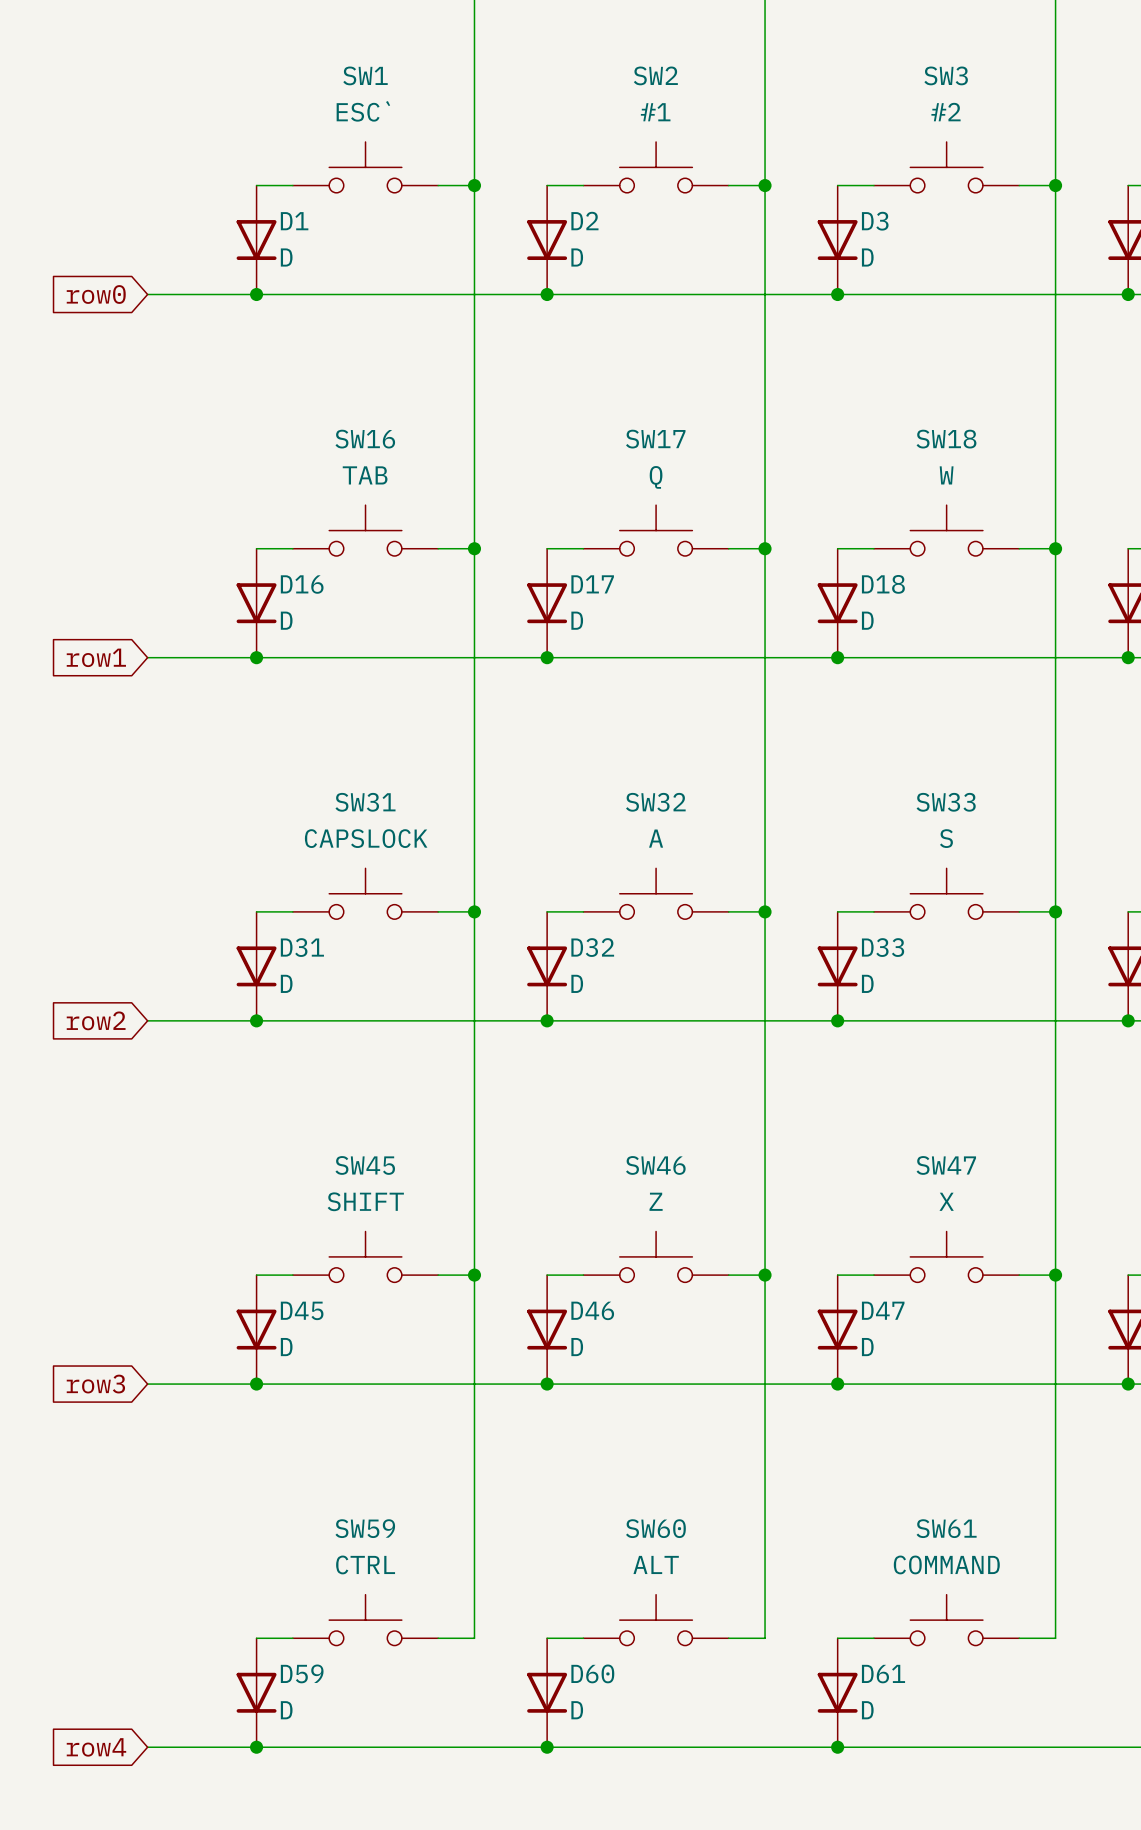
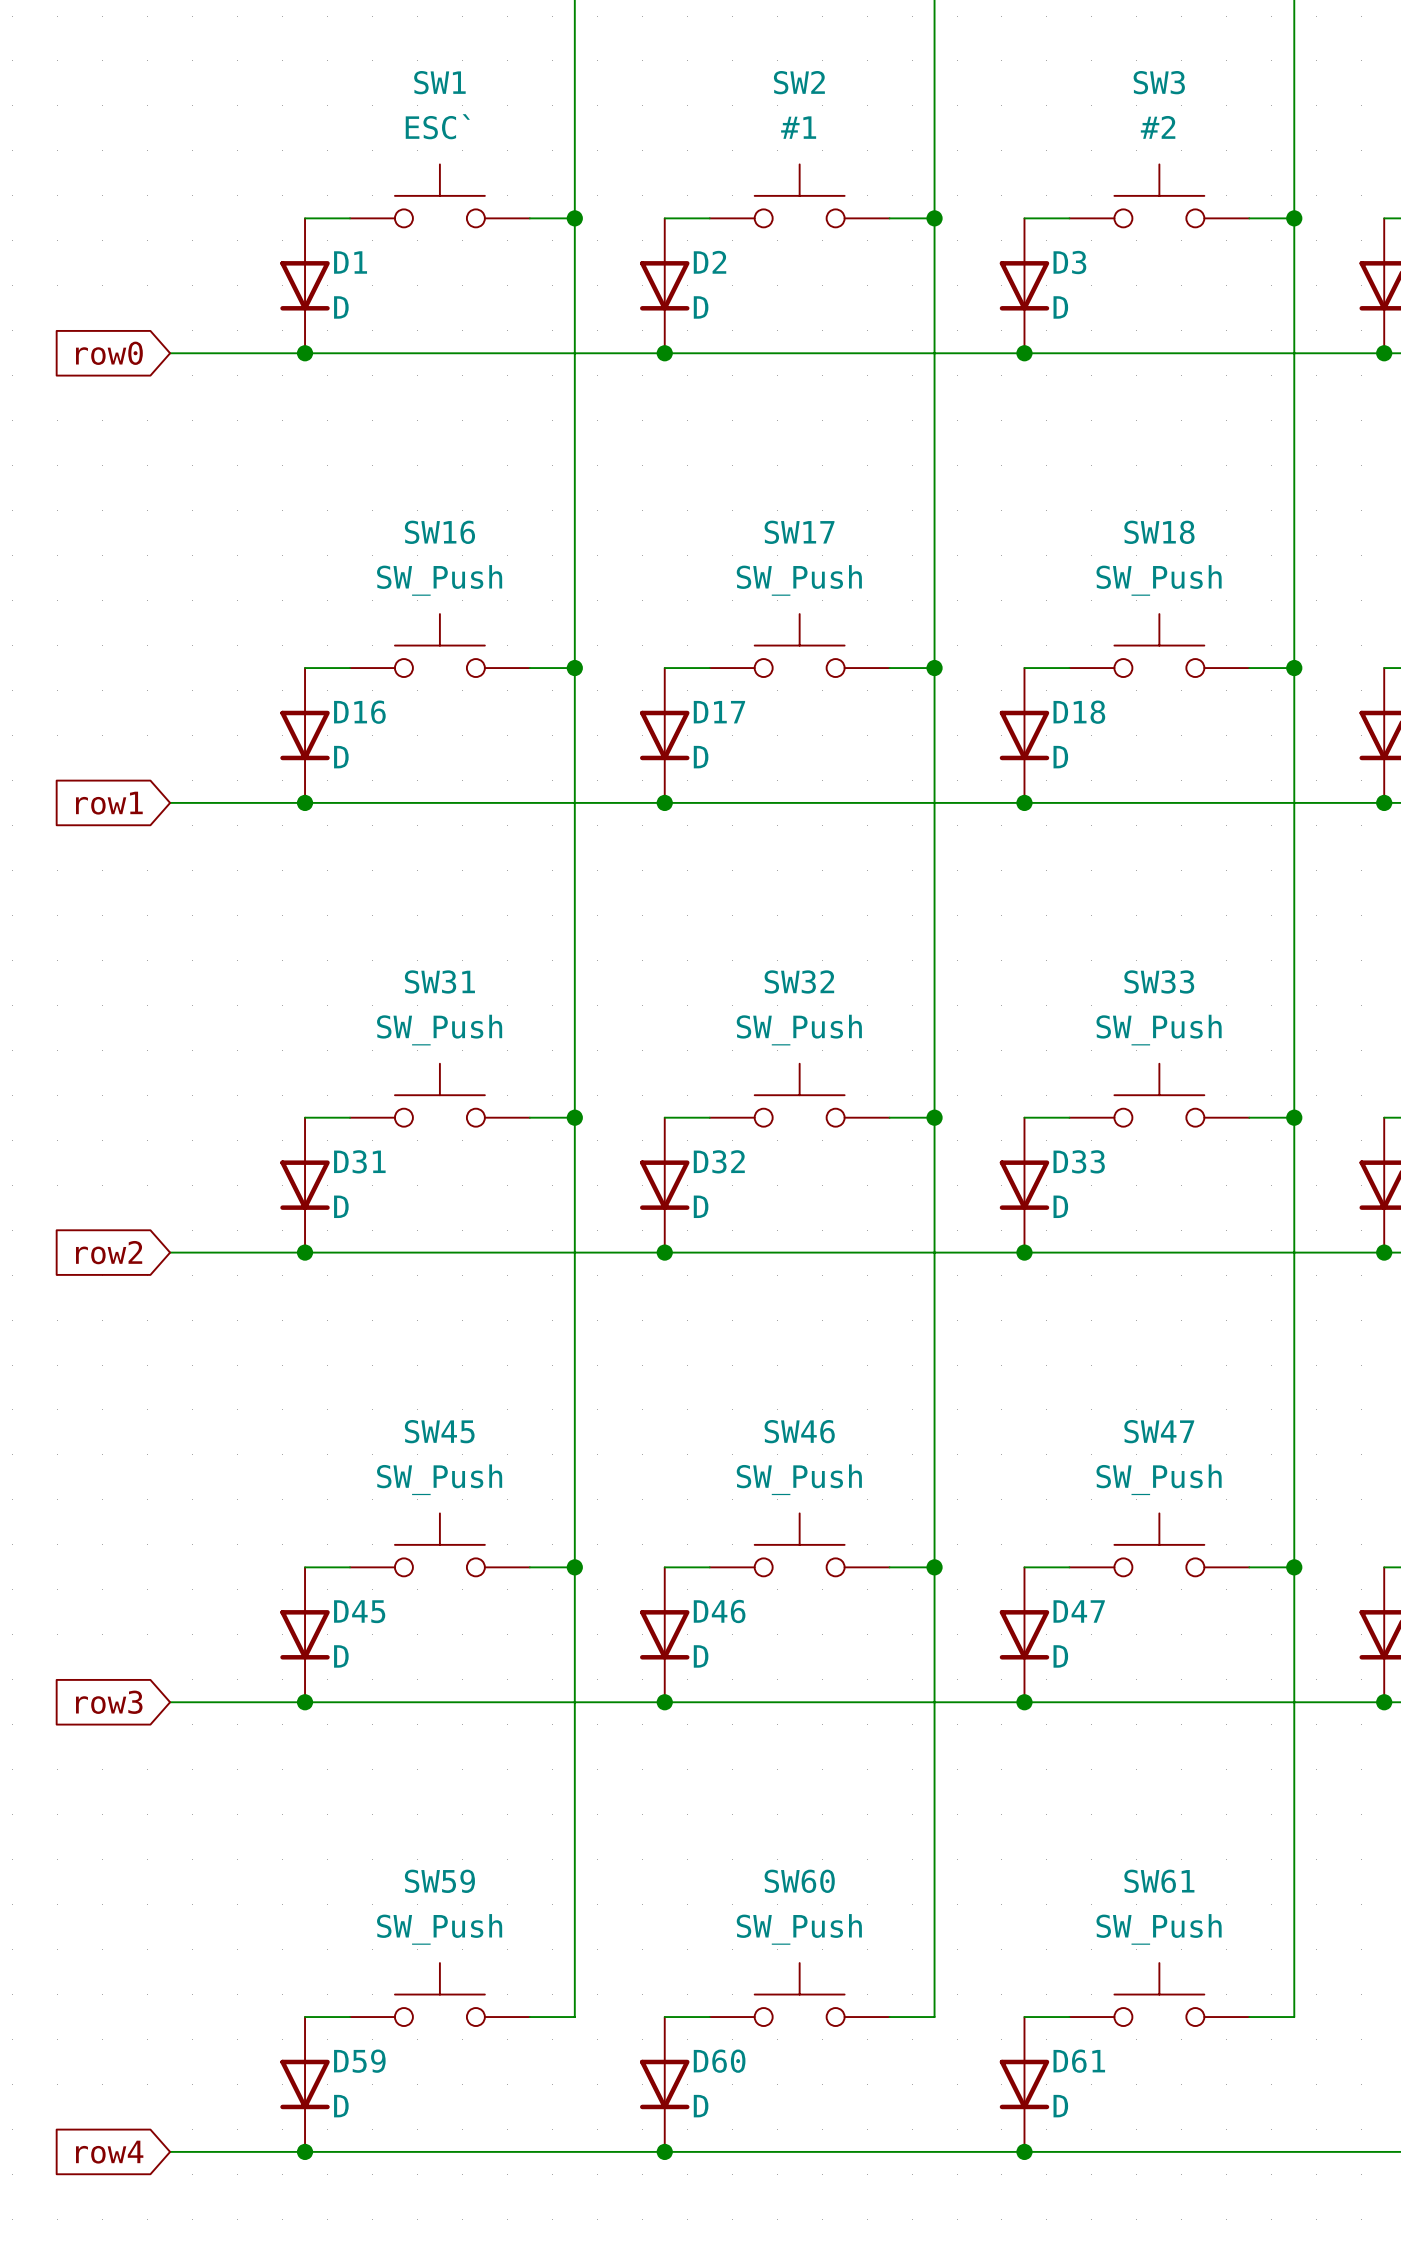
SW16 value: TAB (365, 475) -> SW_Push (439, 580)
SW18 value: W (946, 475) -> SW_Push (1159, 580)
SW17 value: Q (656, 477) -> SW_Push (799, 580)
SW31 value: CAPSLOCK (366, 838) -> SW_Push (439, 1030)
SW32 value: A (656, 838) -> SW_Push (799, 1030)
SW33 value: S (946, 838) -> SW_Push (1159, 1030)
SW45 value: SHIFT (365, 1201) -> SW_Push (439, 1479)
SW46 value: Z (656, 1201) -> SW_Push (799, 1479)
SW47 value: X (946, 1201) -> SW_Push (1159, 1479)
SW59 value: CTRL (365, 1564) -> SW_Push (439, 1929)
SW60 value: ALT (656, 1564) -> SW_Push (799, 1929)
SW61 value: COMMAND (946, 1564) -> SW_Push (1159, 1929)

